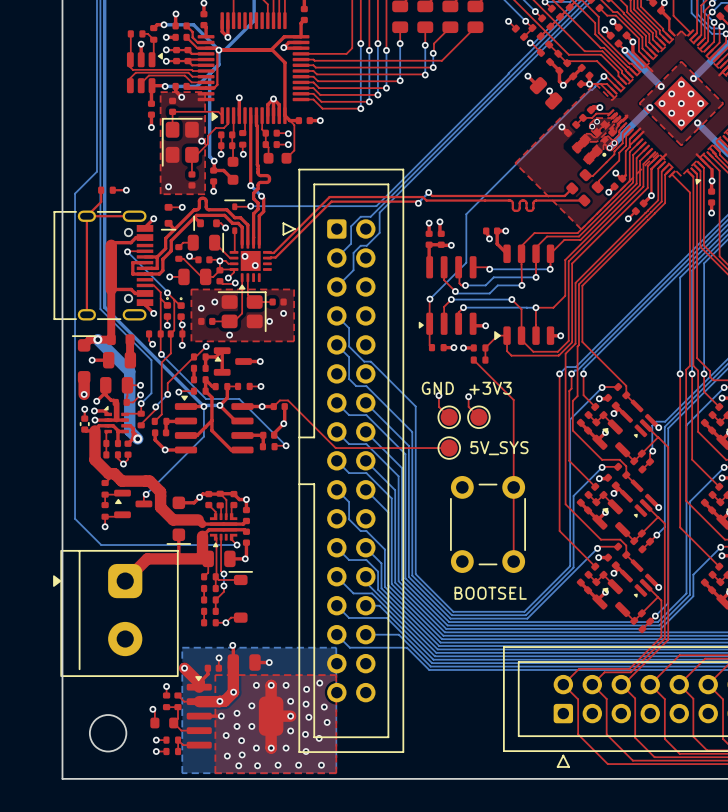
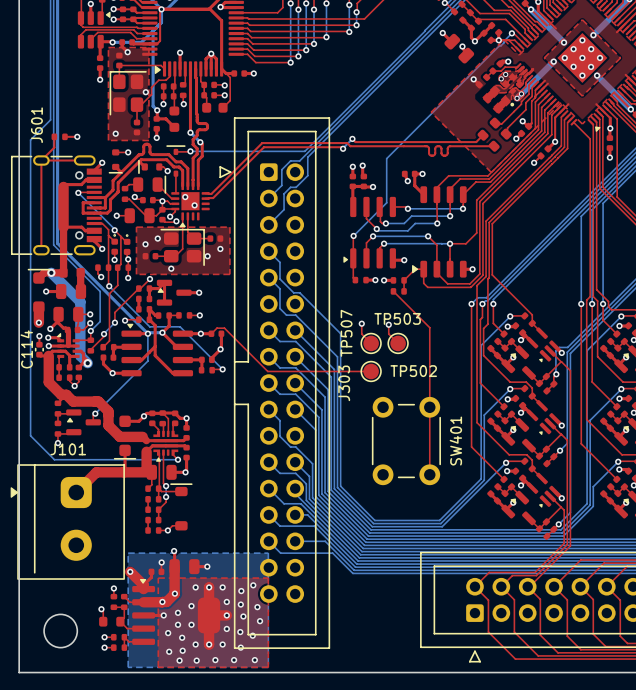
J601 name: none -> J601 (36, 125)
GND name: GND (437, 388) -> TP507 (346, 333)
+3V3 name: +3V3 (490, 388) -> TP503 (397, 318)
C114 name: none -> C114 (26, 349)
5V_SYS name: 5V_SYS (499, 448) -> TP502 (413, 371)
J303 name: none -> J303 (344, 383)
SW401 name: none -> SW401 (455, 441)
J101 name: none -> J101 (68, 449)
text: BOOTSEL (490, 593) -> none

